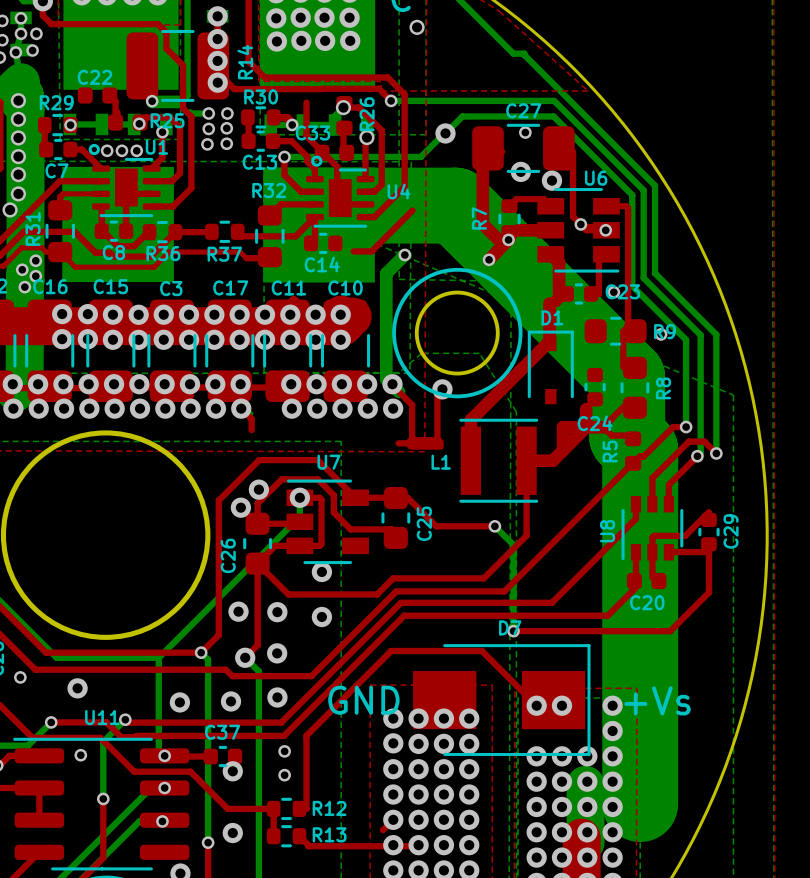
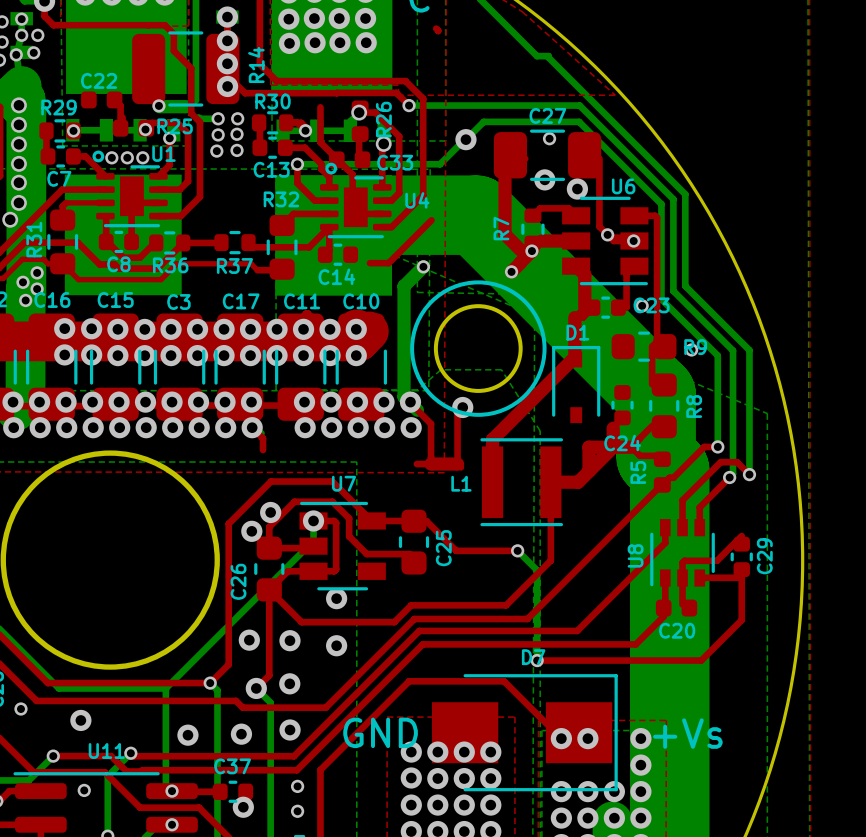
via: (417, 27) -> none
C33 name position: C33 (312, 132) -> C33 (395, 162)

